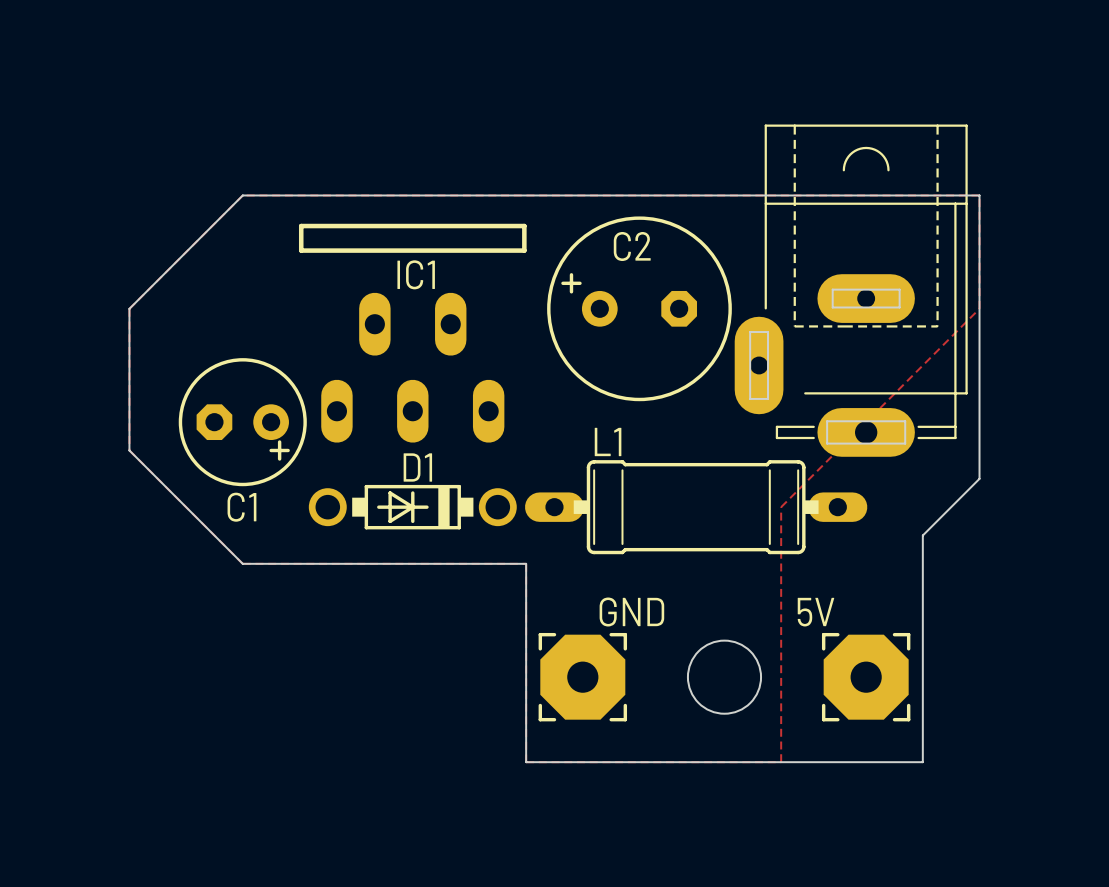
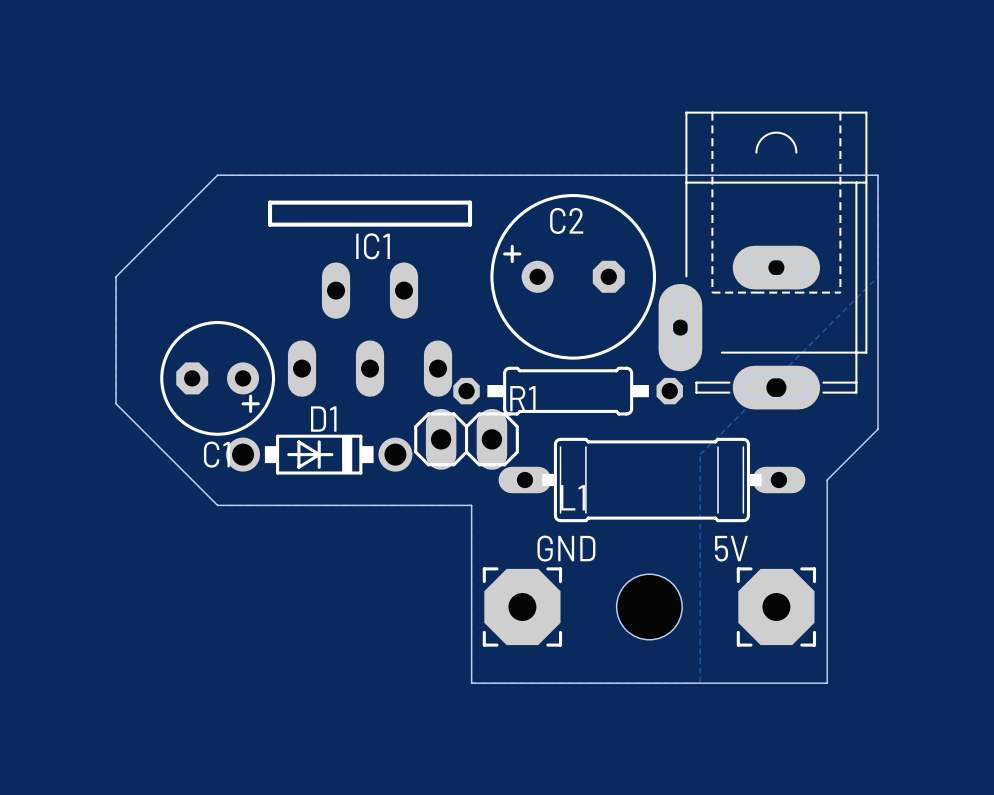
R1: none -> (568, 391)
L1 name position: L1 (608, 441) -> L1 (572, 497)
part: none -> (466, 439)
D1 position: (412, 507) -> (319, 454)
L1 position: (696, 507) -> (651, 480)

